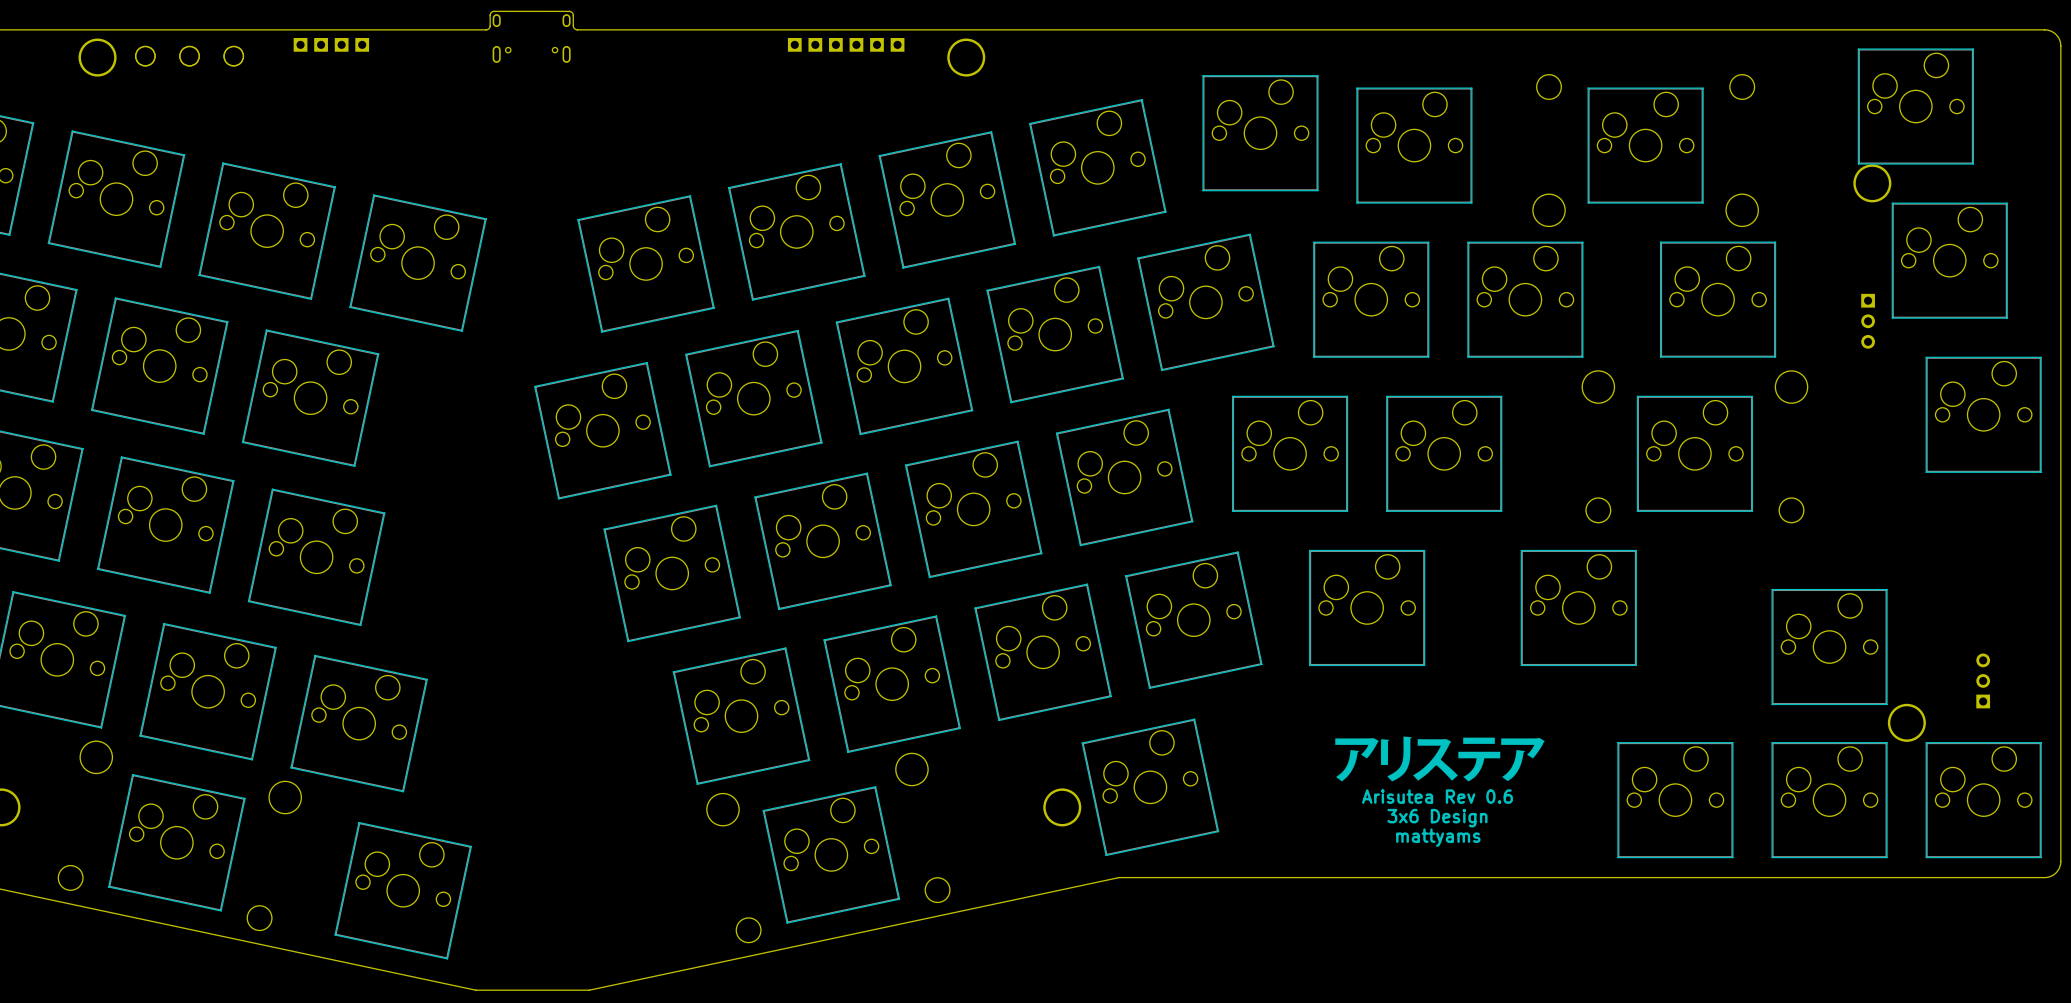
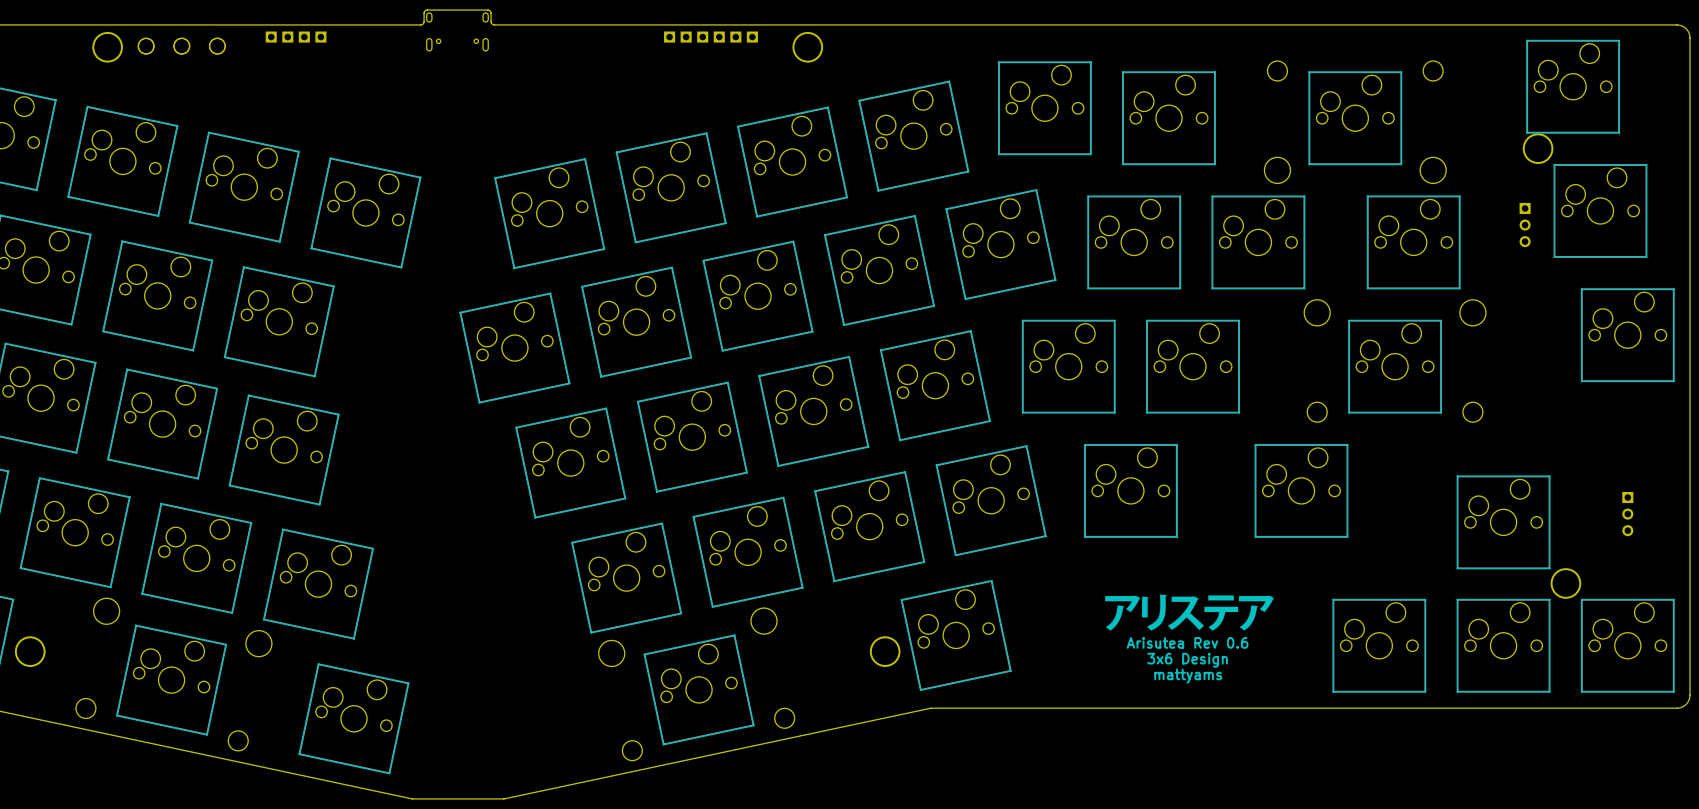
part position: (1868, 321) -> (1525, 225)
part rotation: 0° (1983, 680) -> 180° (1627, 514)
part position: (1983, 680) -> (1627, 514)

